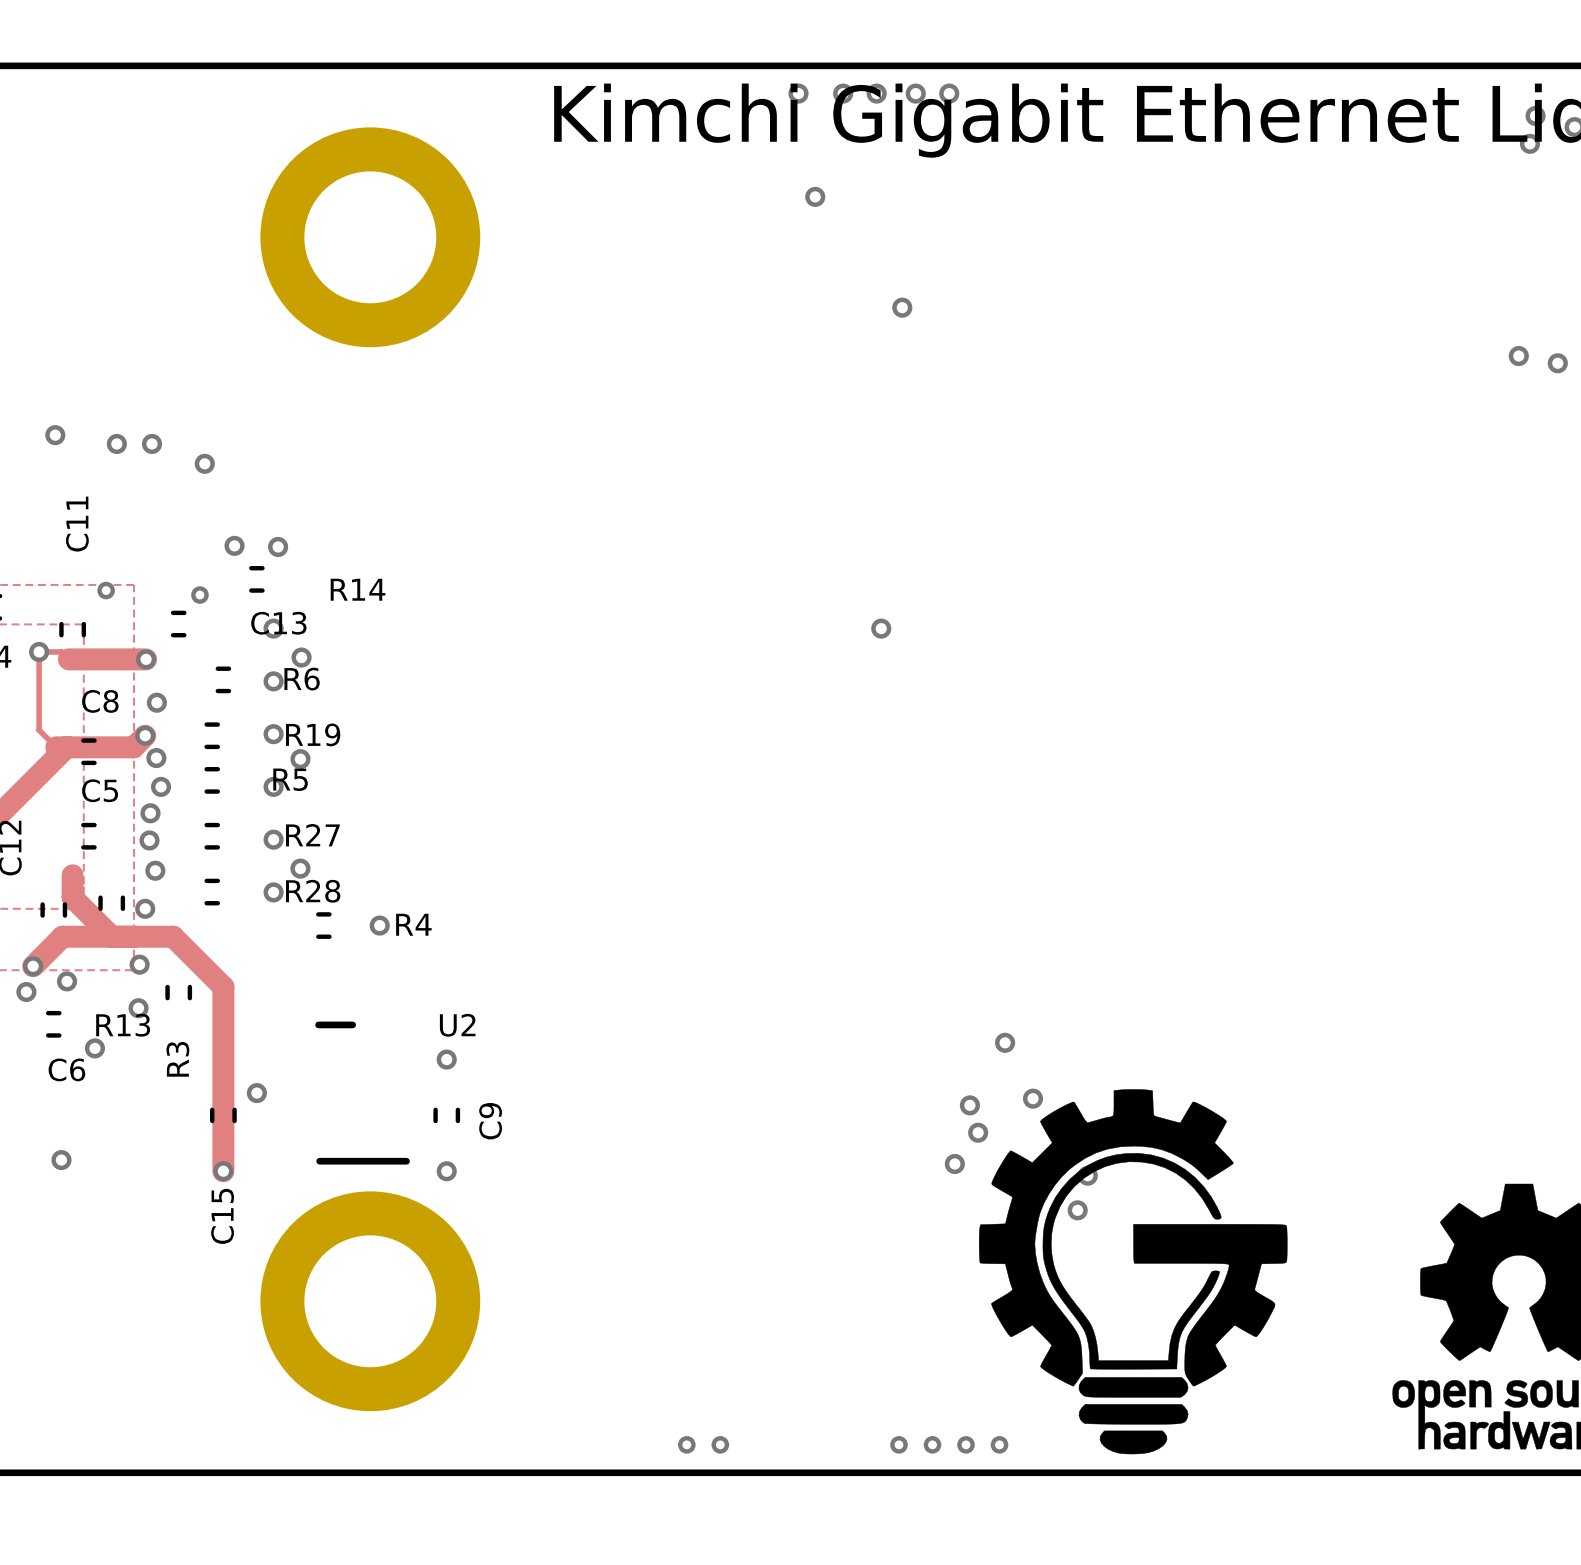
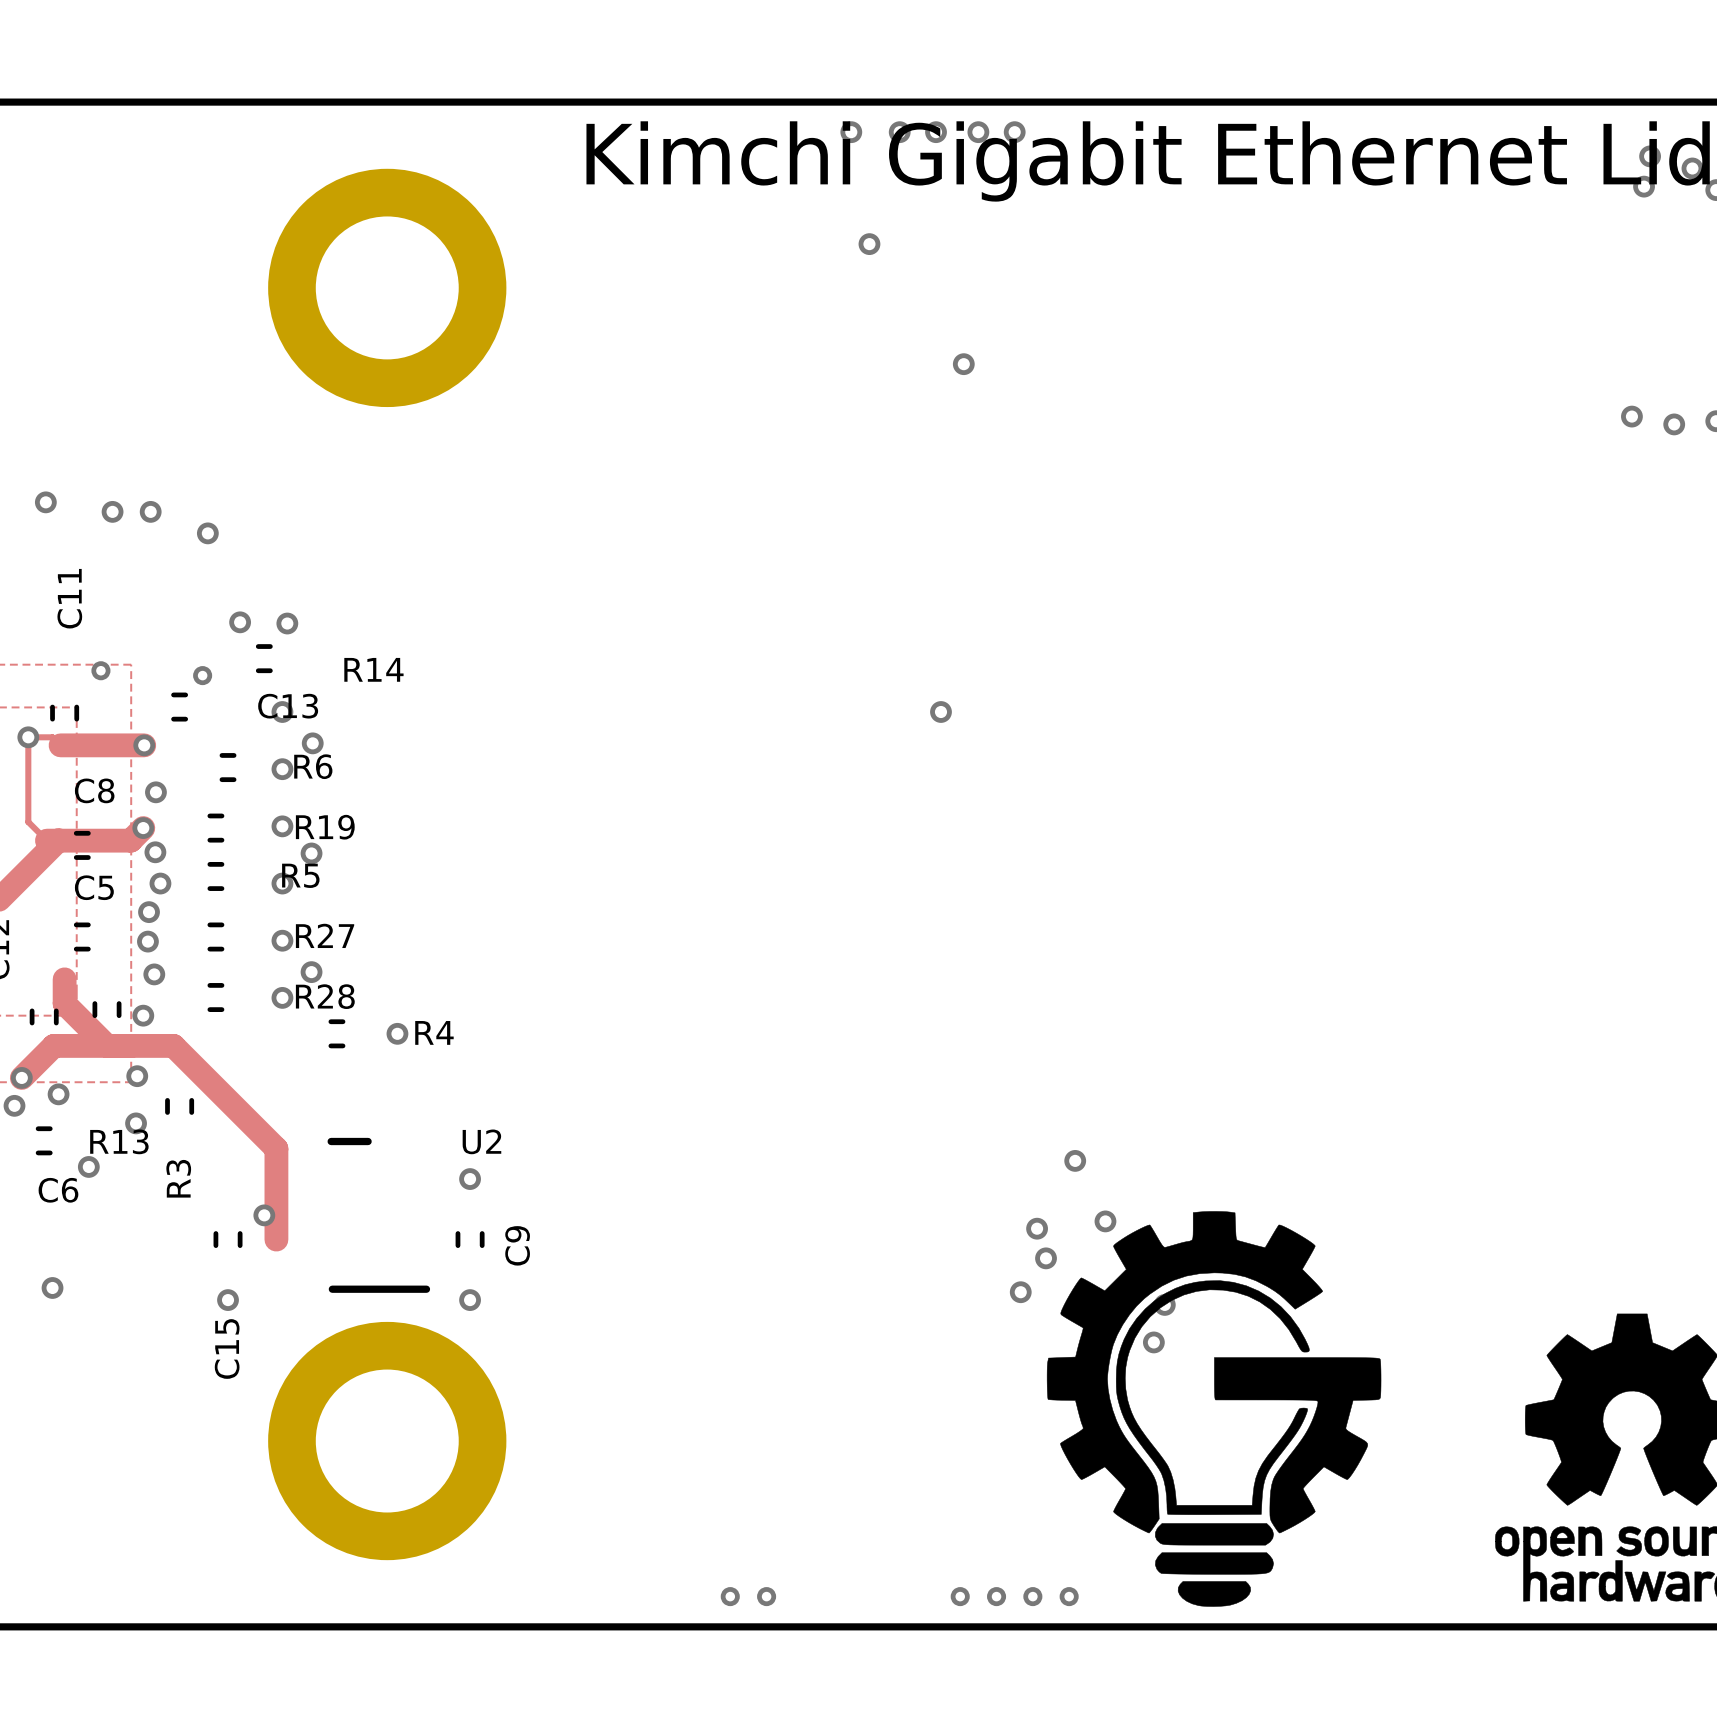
track: (223, 986) (223, 1171) -> (228, 1100) (276, 1148) (276, 1239)

